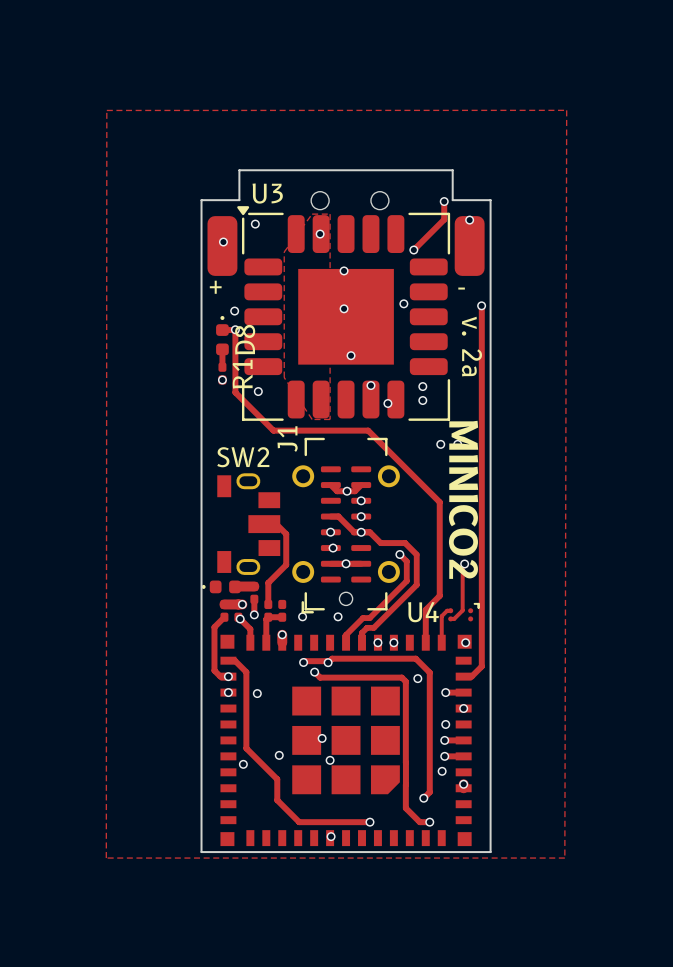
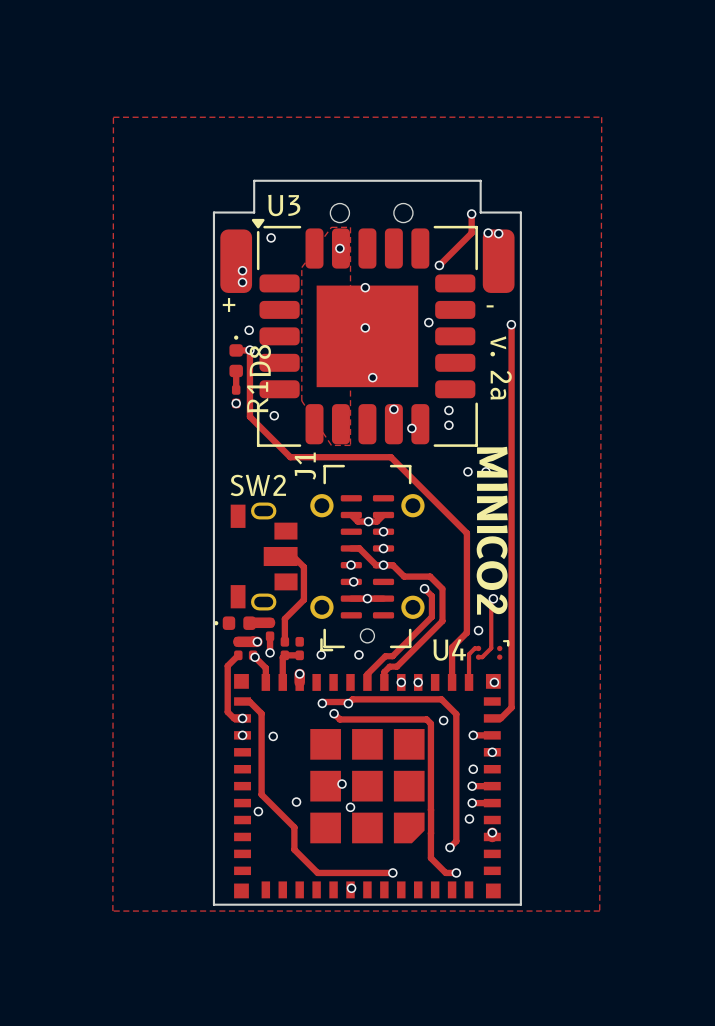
via: none -> (488, 233)
via: (223, 242) -> none
via: none -> (242, 270)
via: none -> (242, 282)
via: none -> (478, 630)

